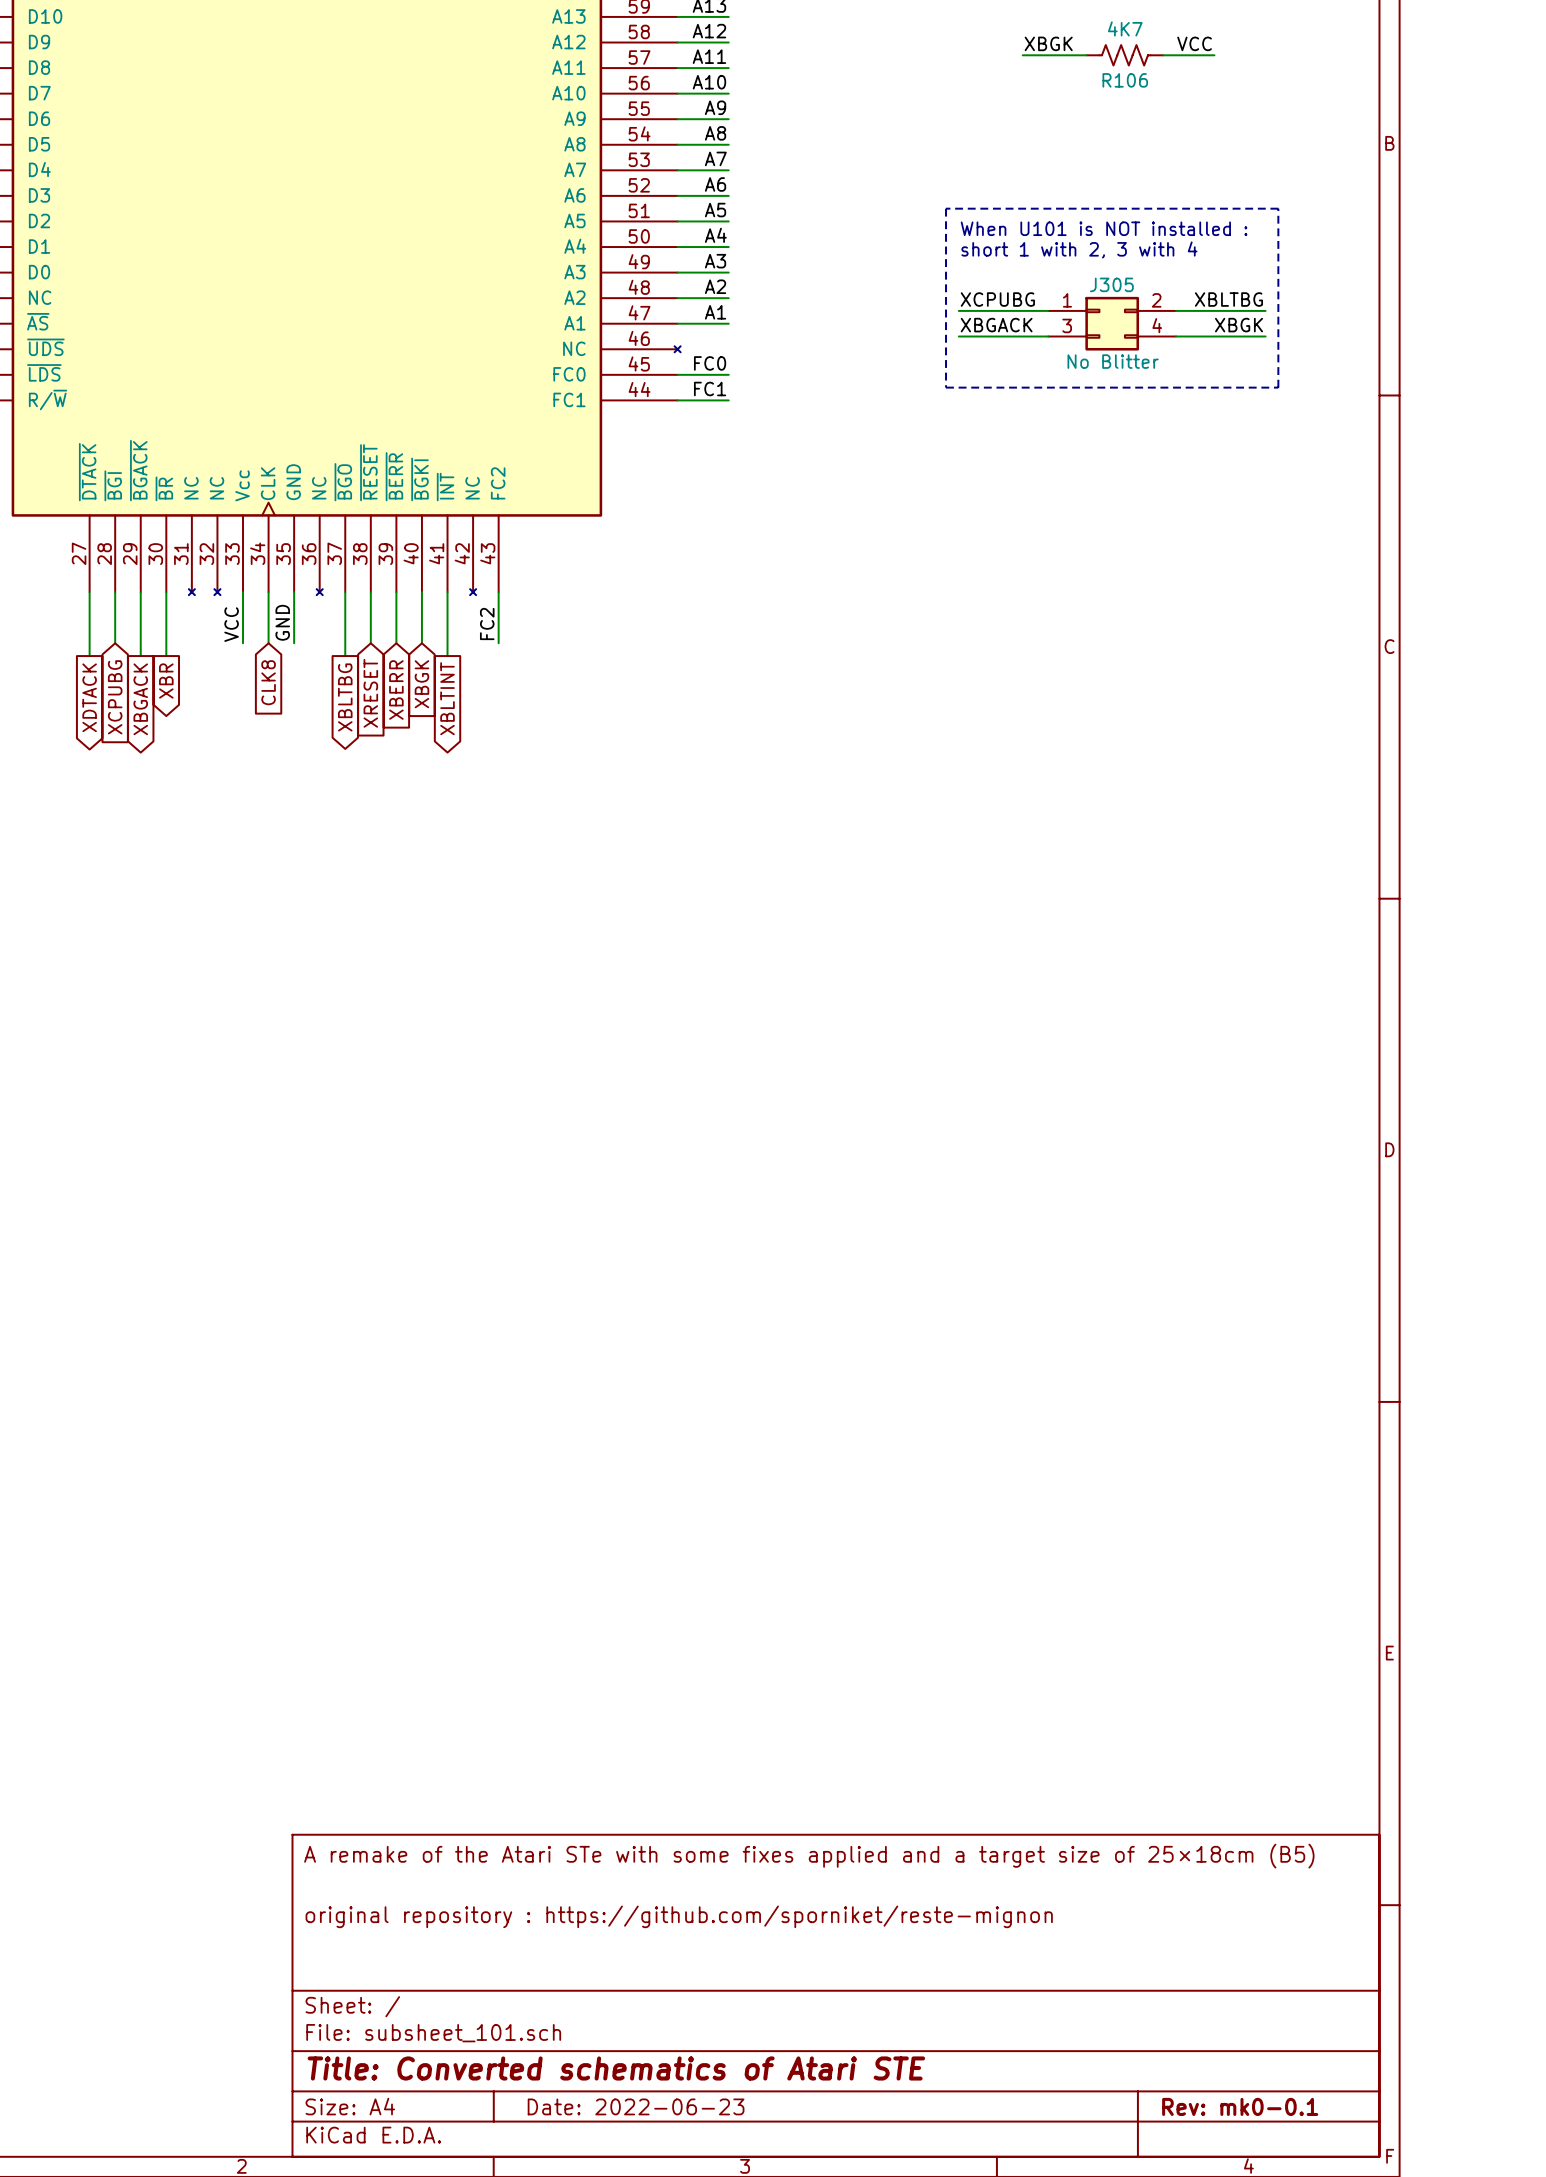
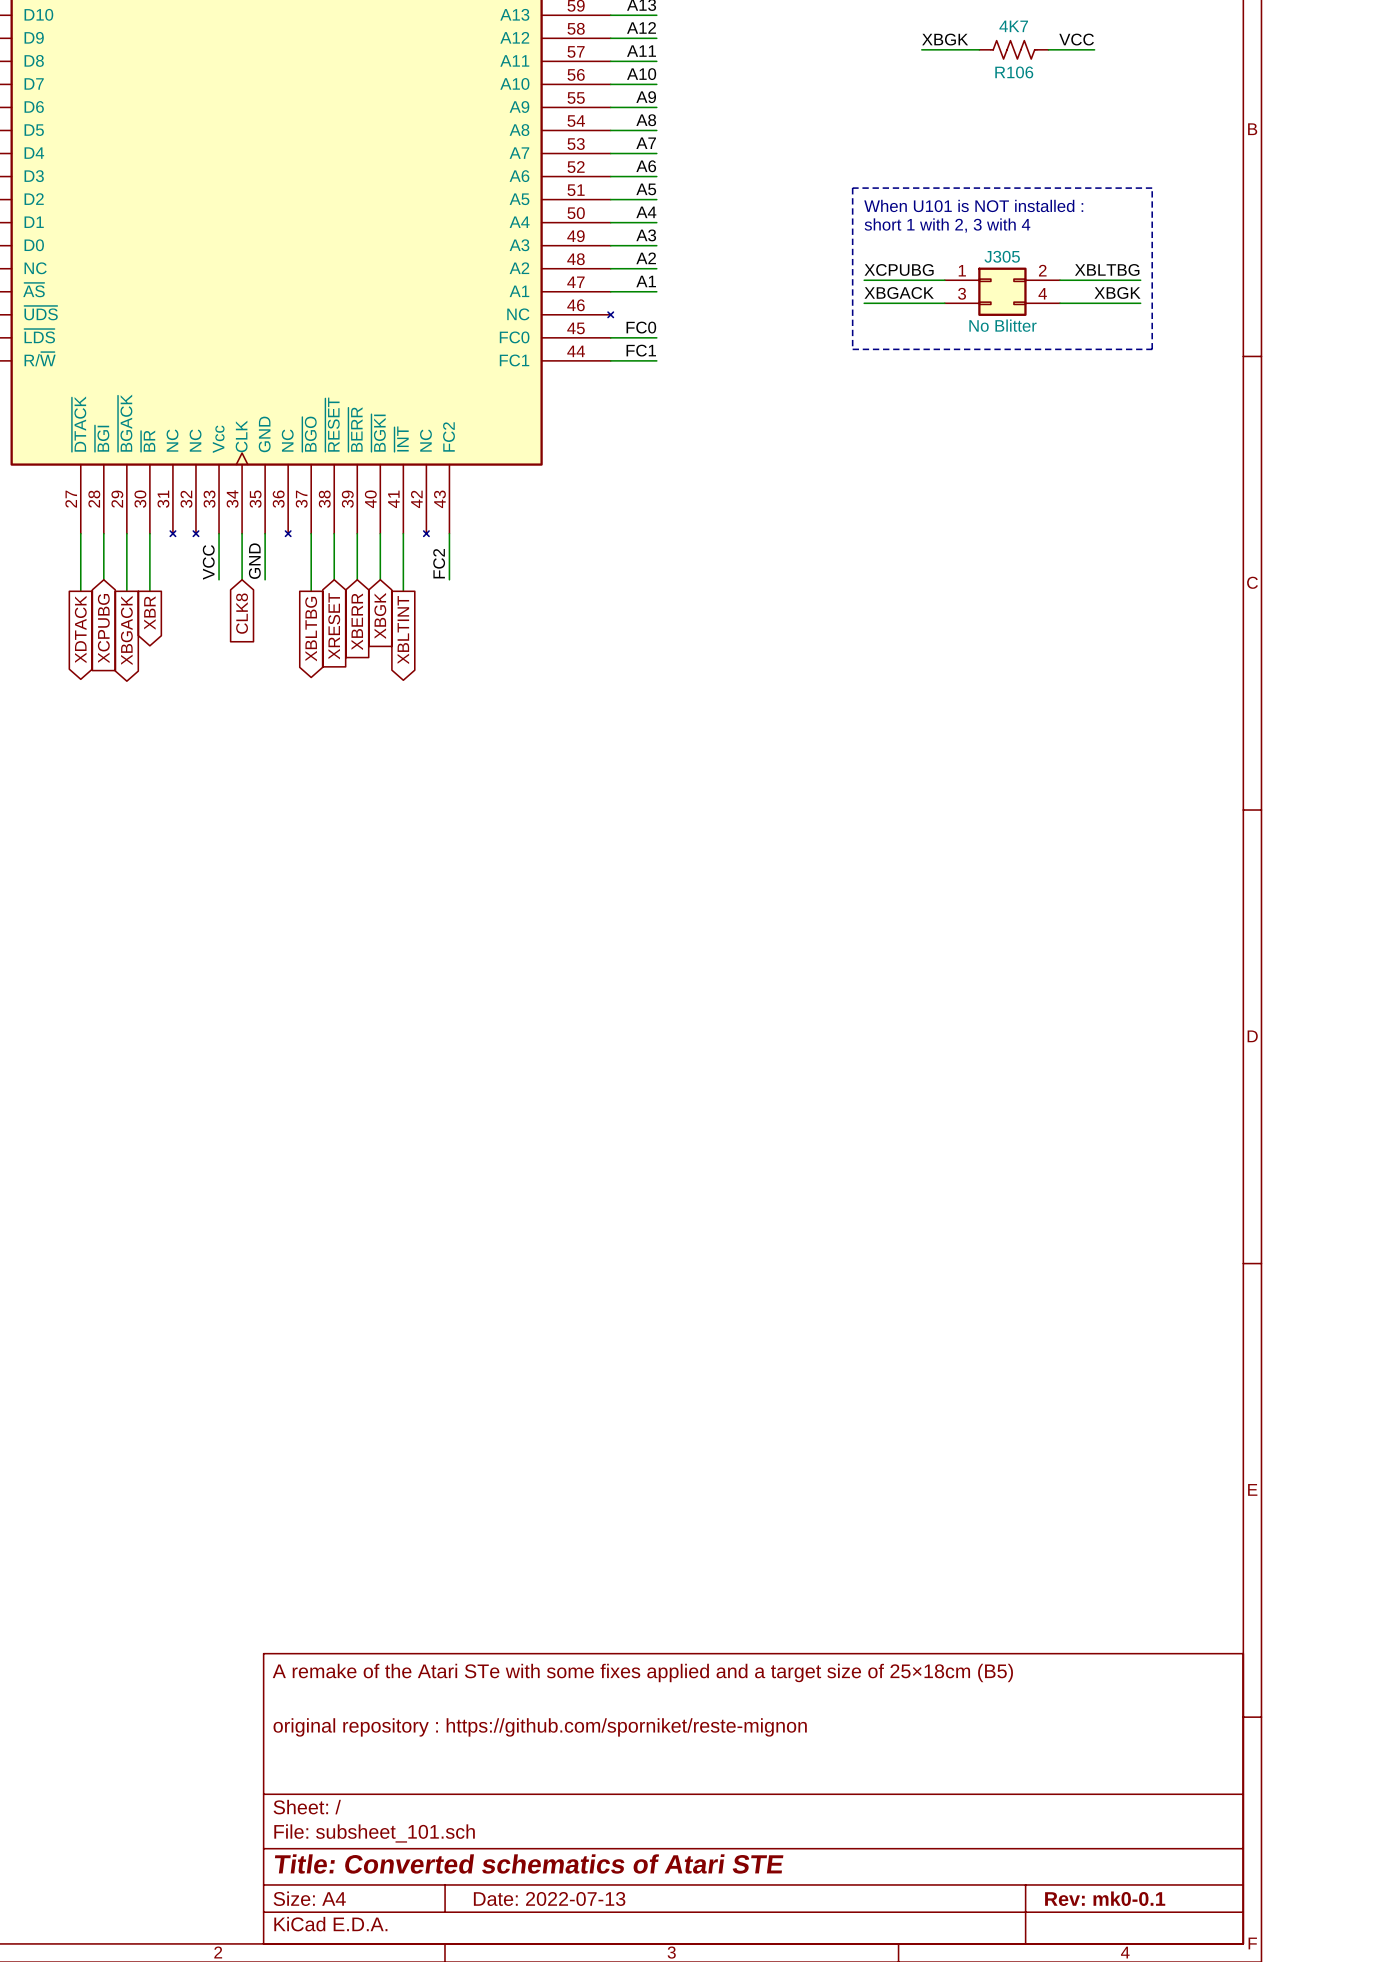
title block: Date: 2022-06-23 (636, 2106) -> Date: 2022-07-13 (549, 1898)

